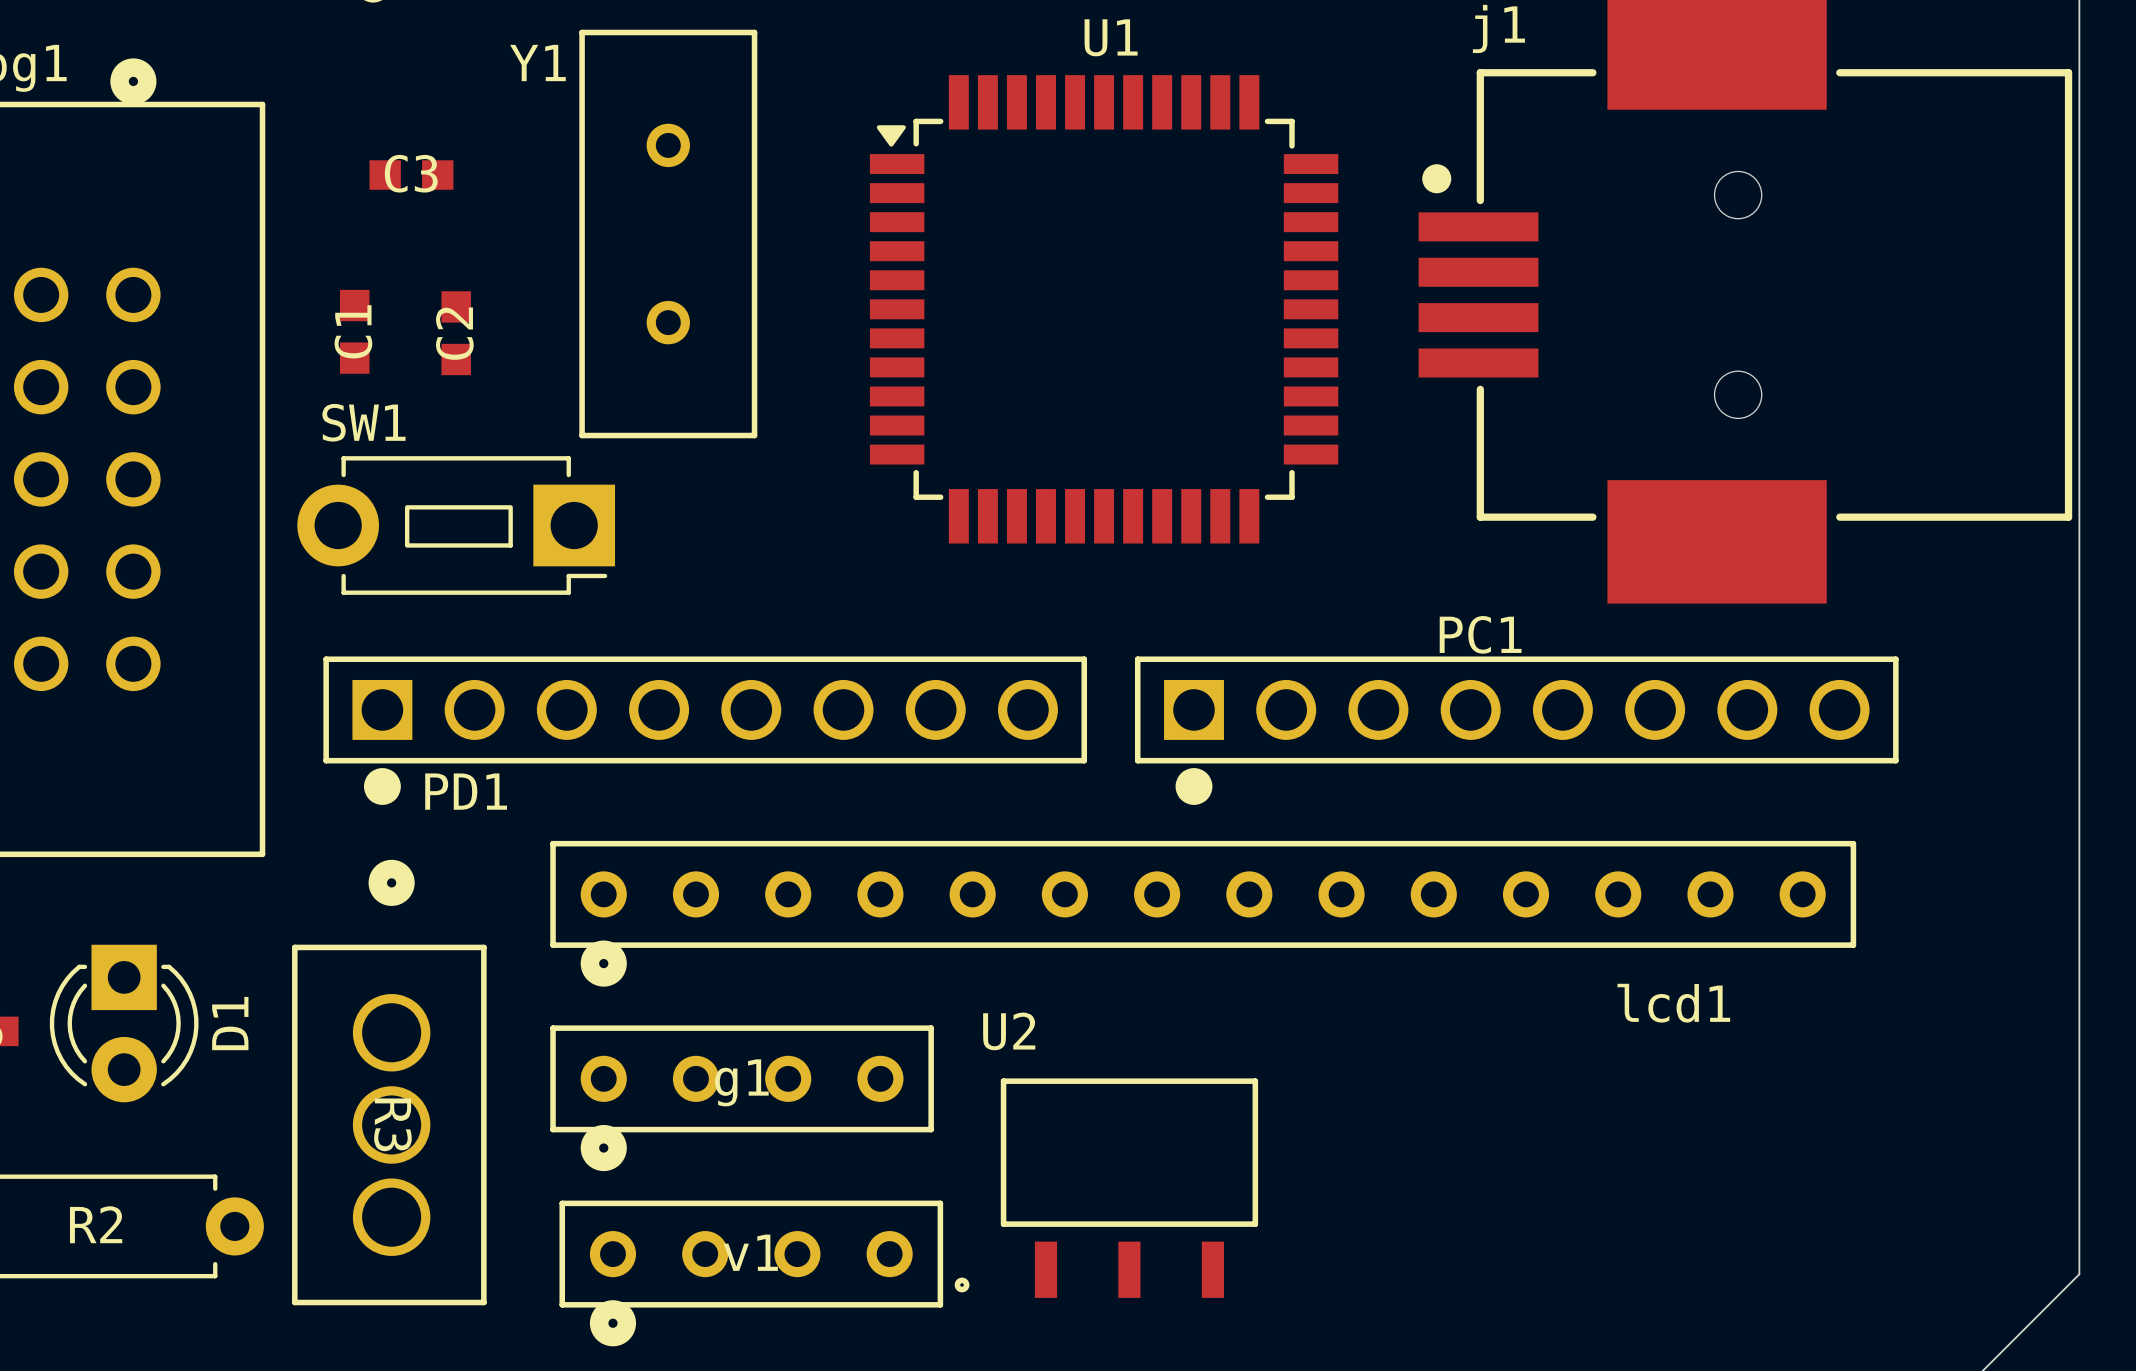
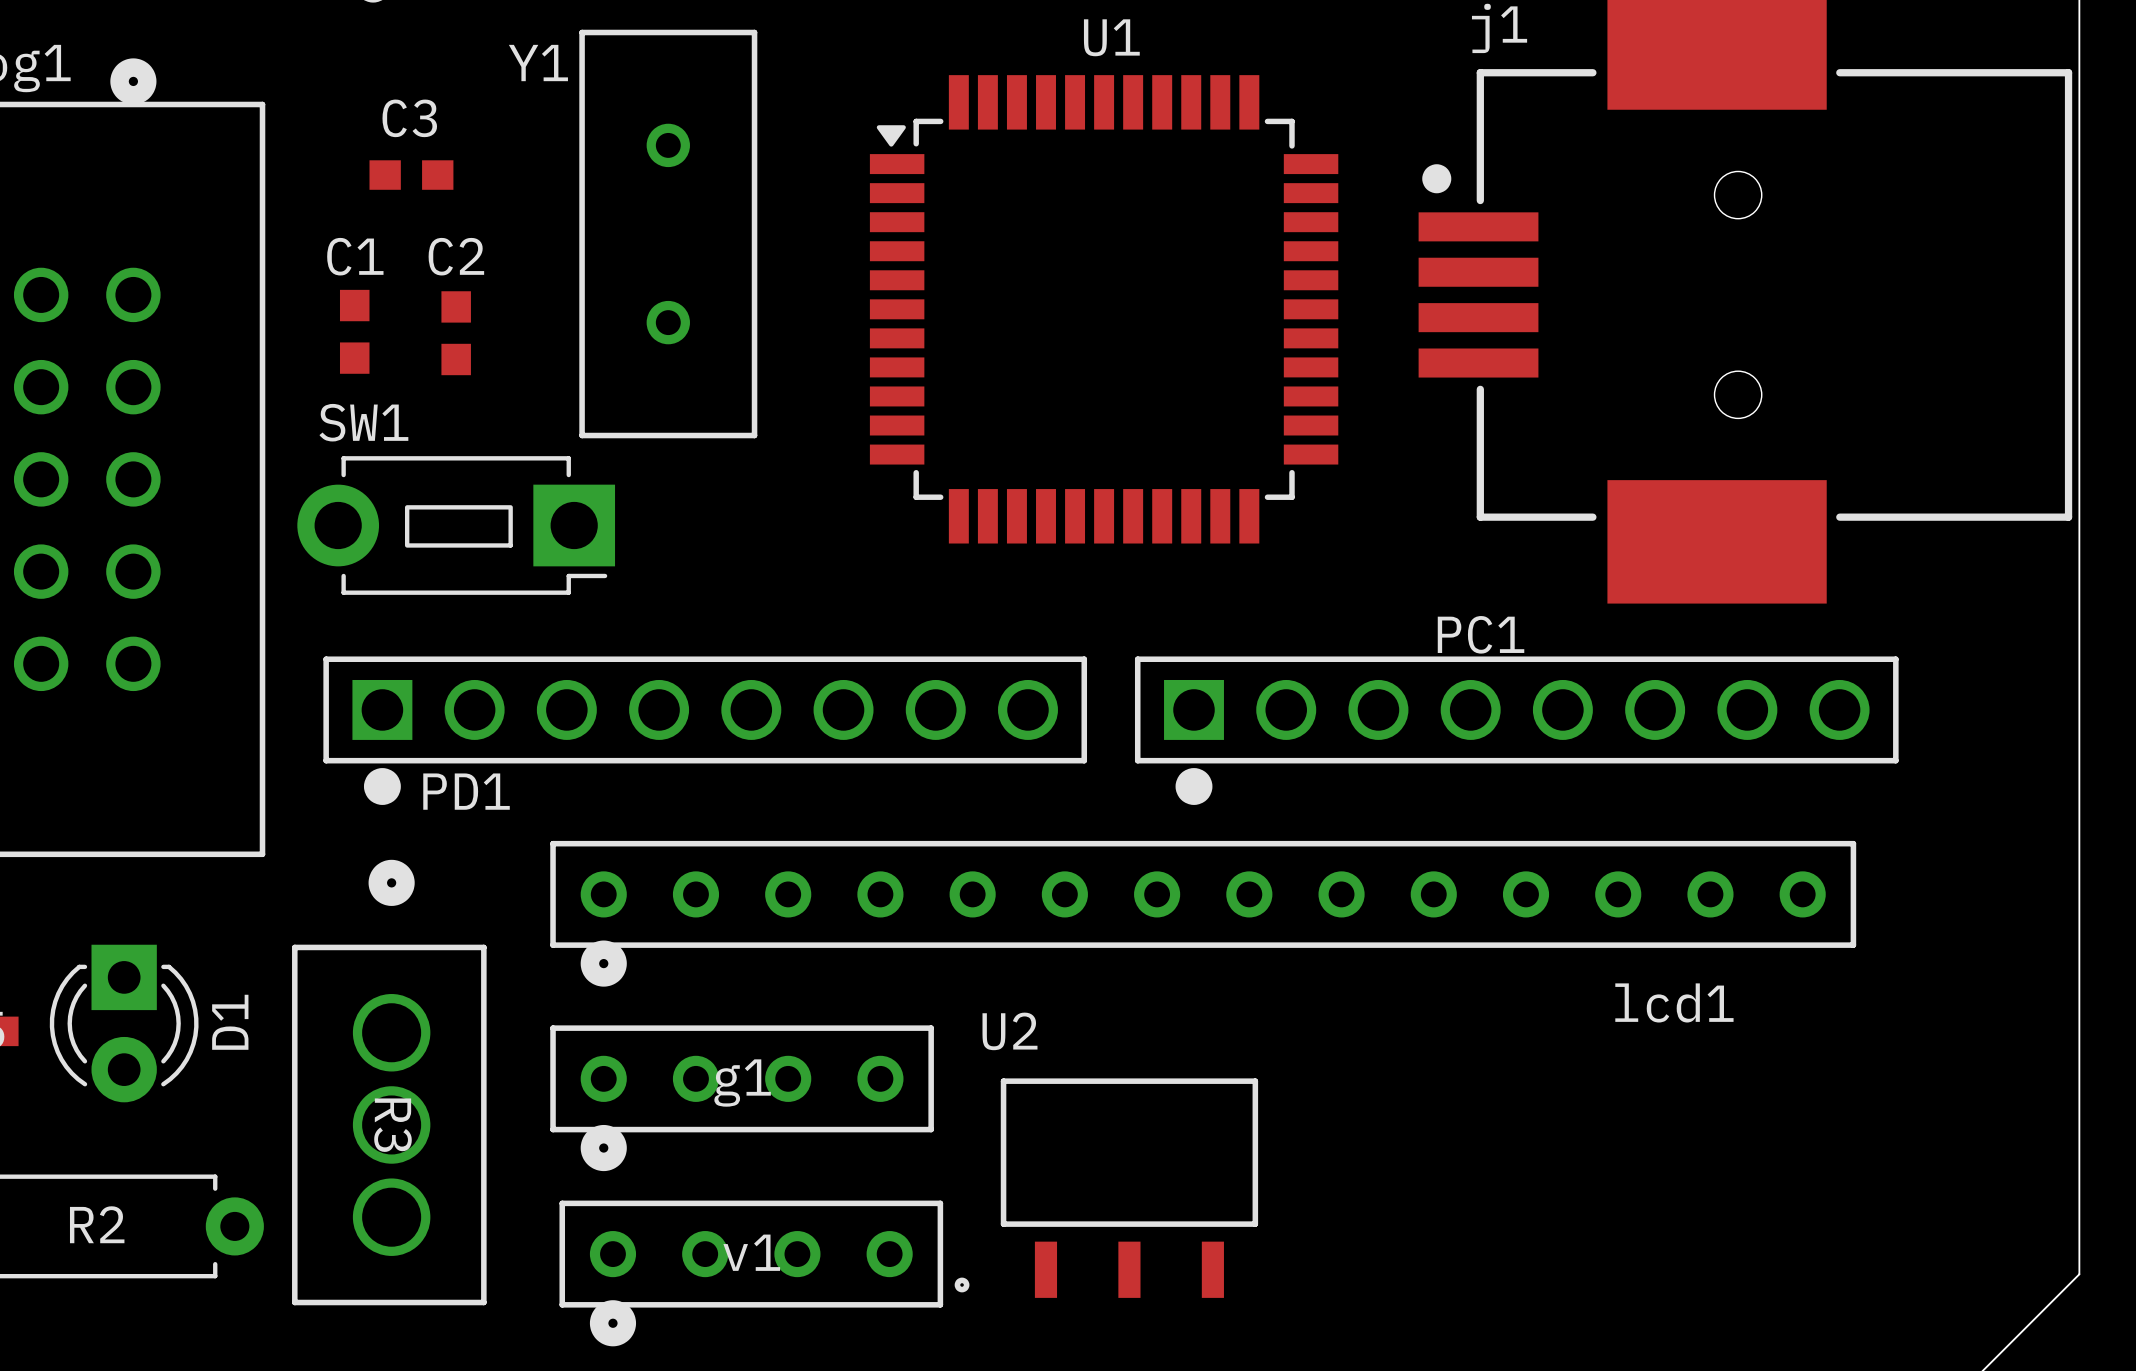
C3 name position: C3 (411, 173) -> C3 (409, 118)
C1 name rotation: 0° (353, 331) -> 90° clockwise (355, 256)
C2 name rotation: 0° (454, 333) -> 90° clockwise (456, 256)

